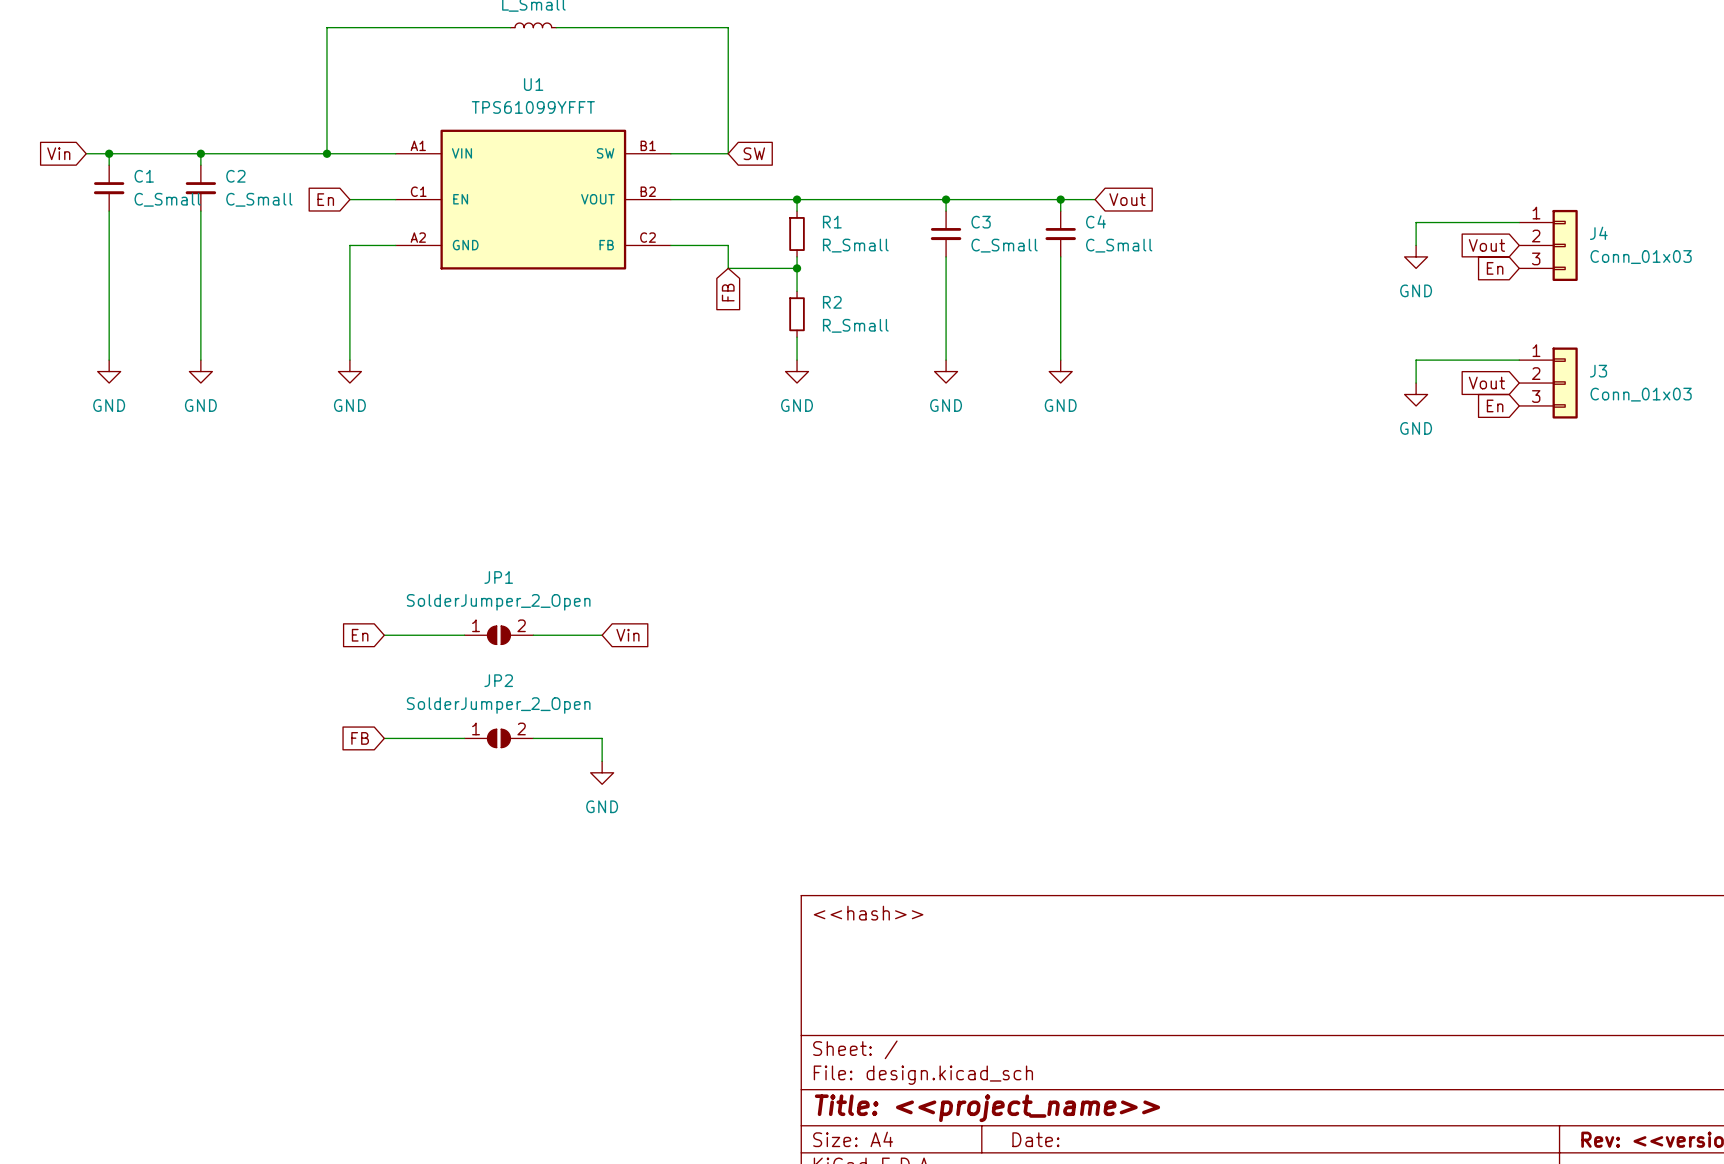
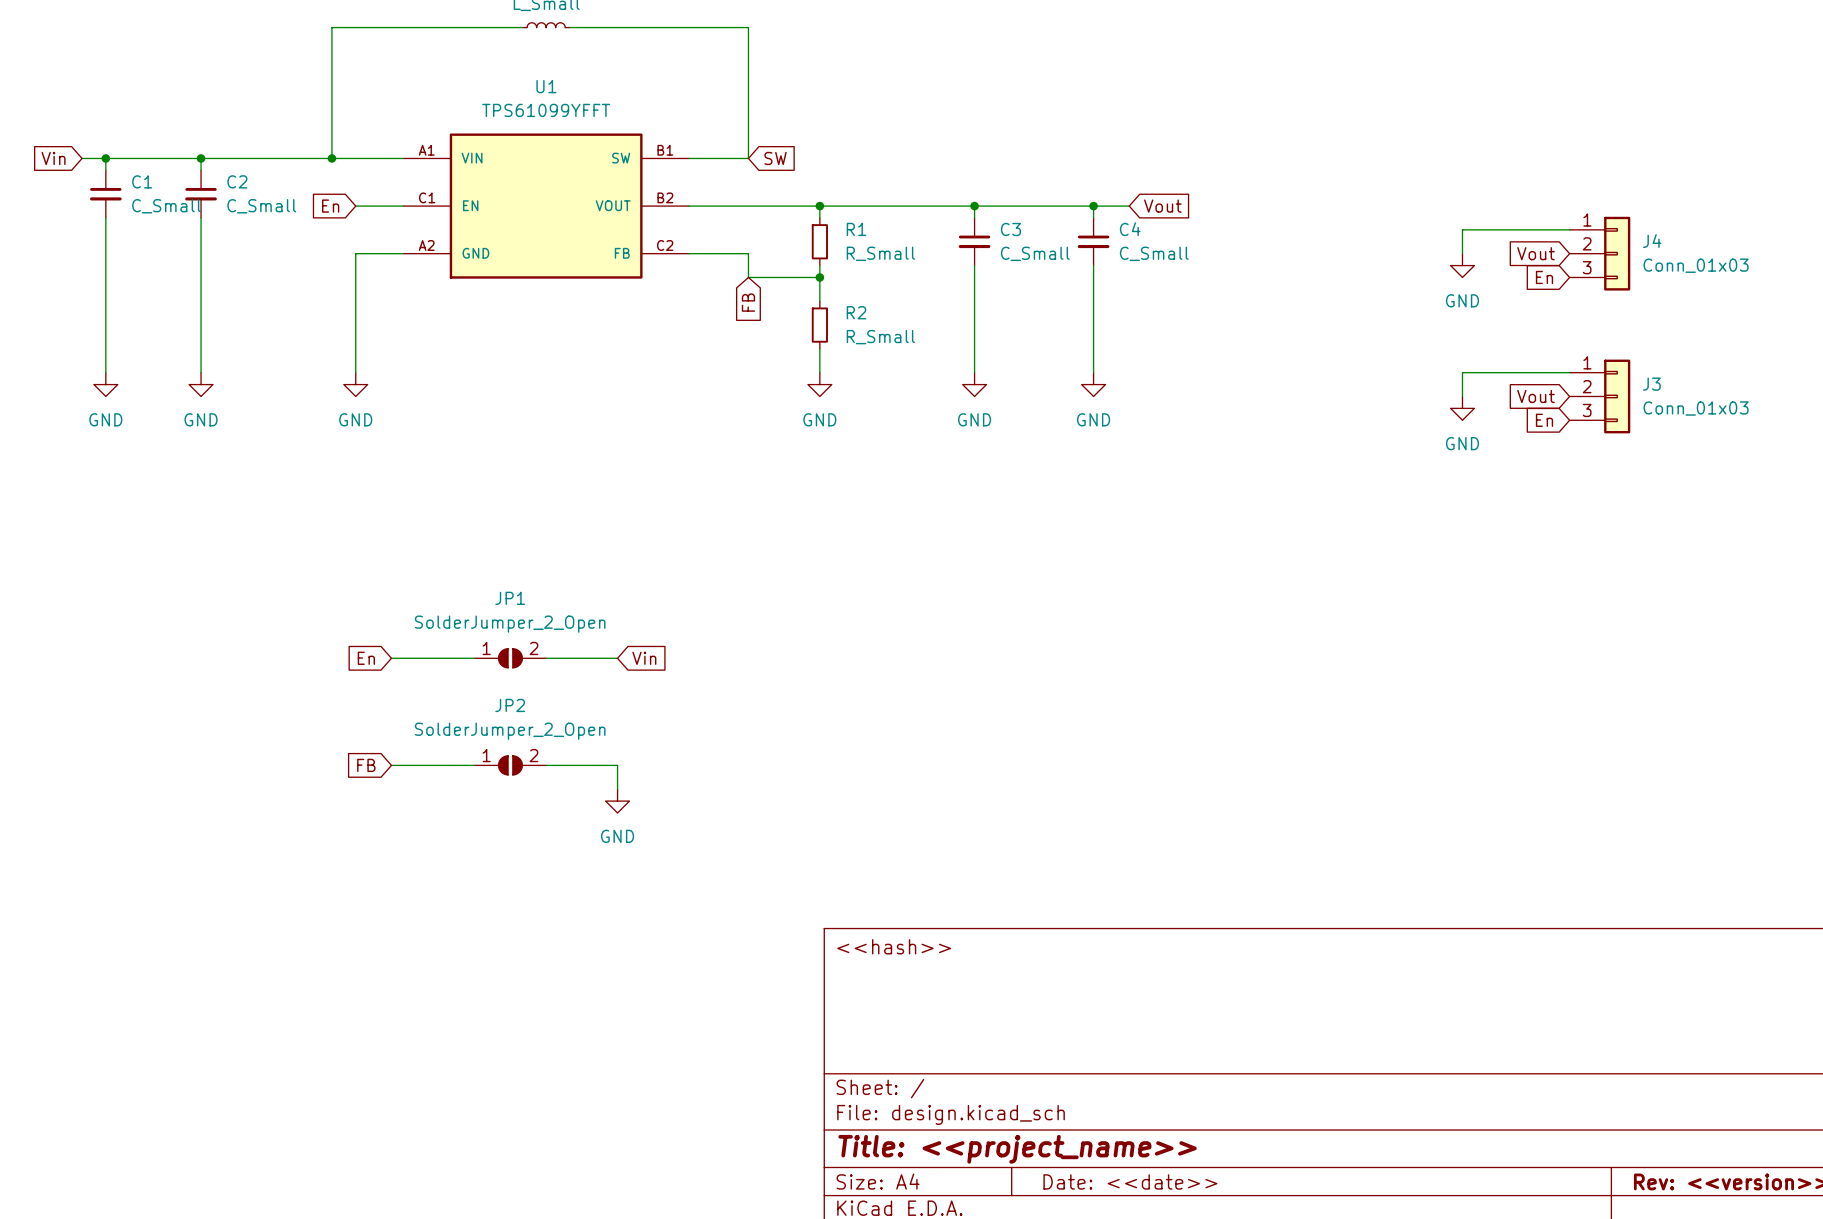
title block: Date: (1035, 1139) -> Date: <<date>> (1130, 1181)

